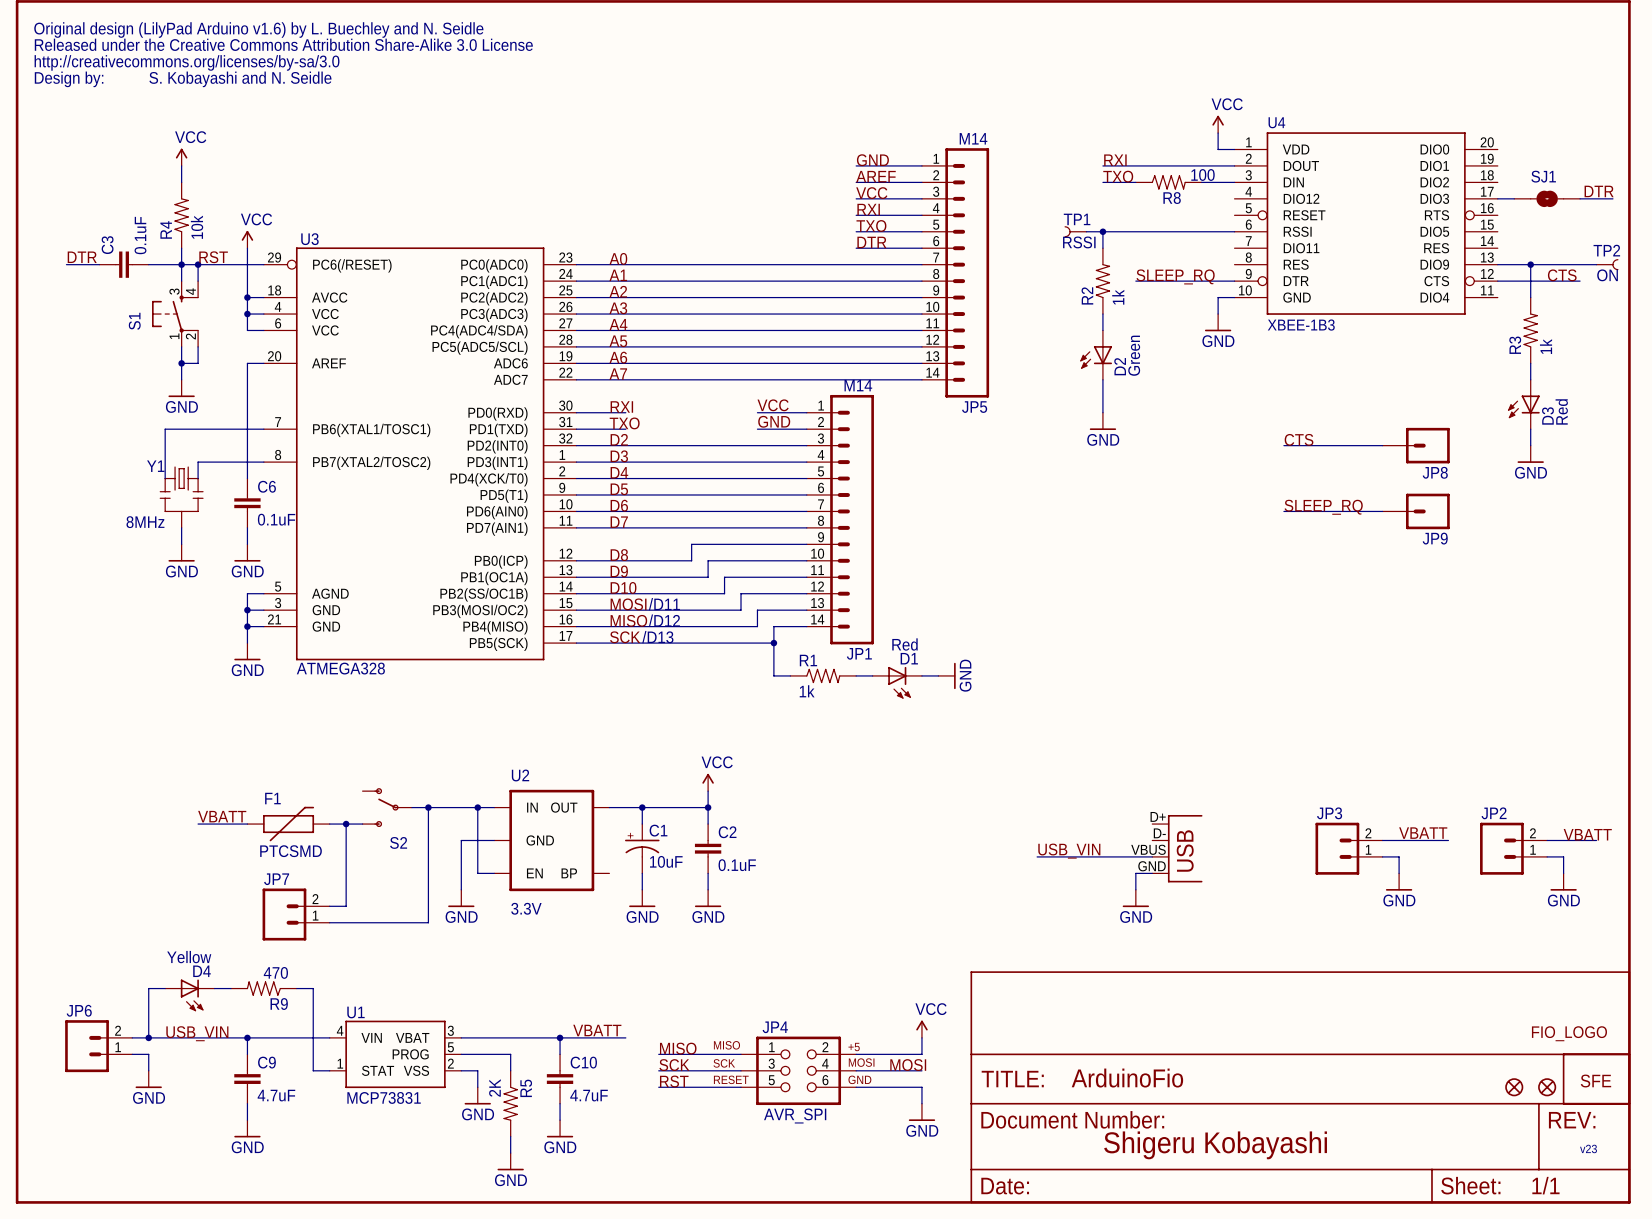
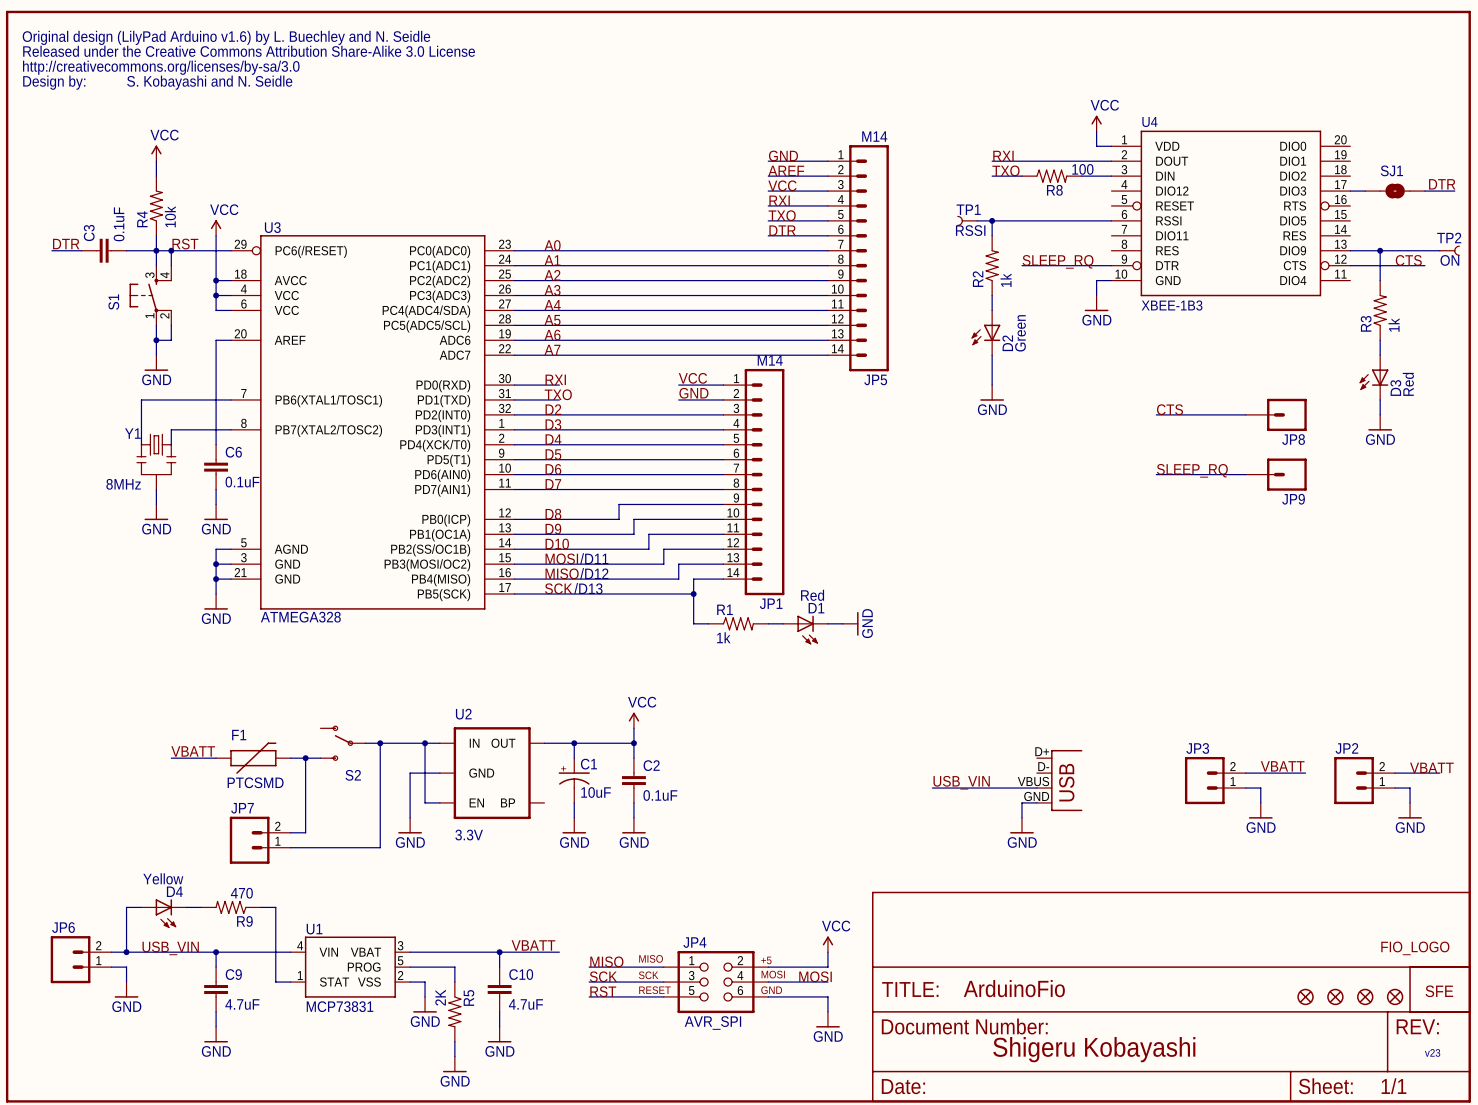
part: none -> (1305, 996)
part: none -> (1335, 996)

